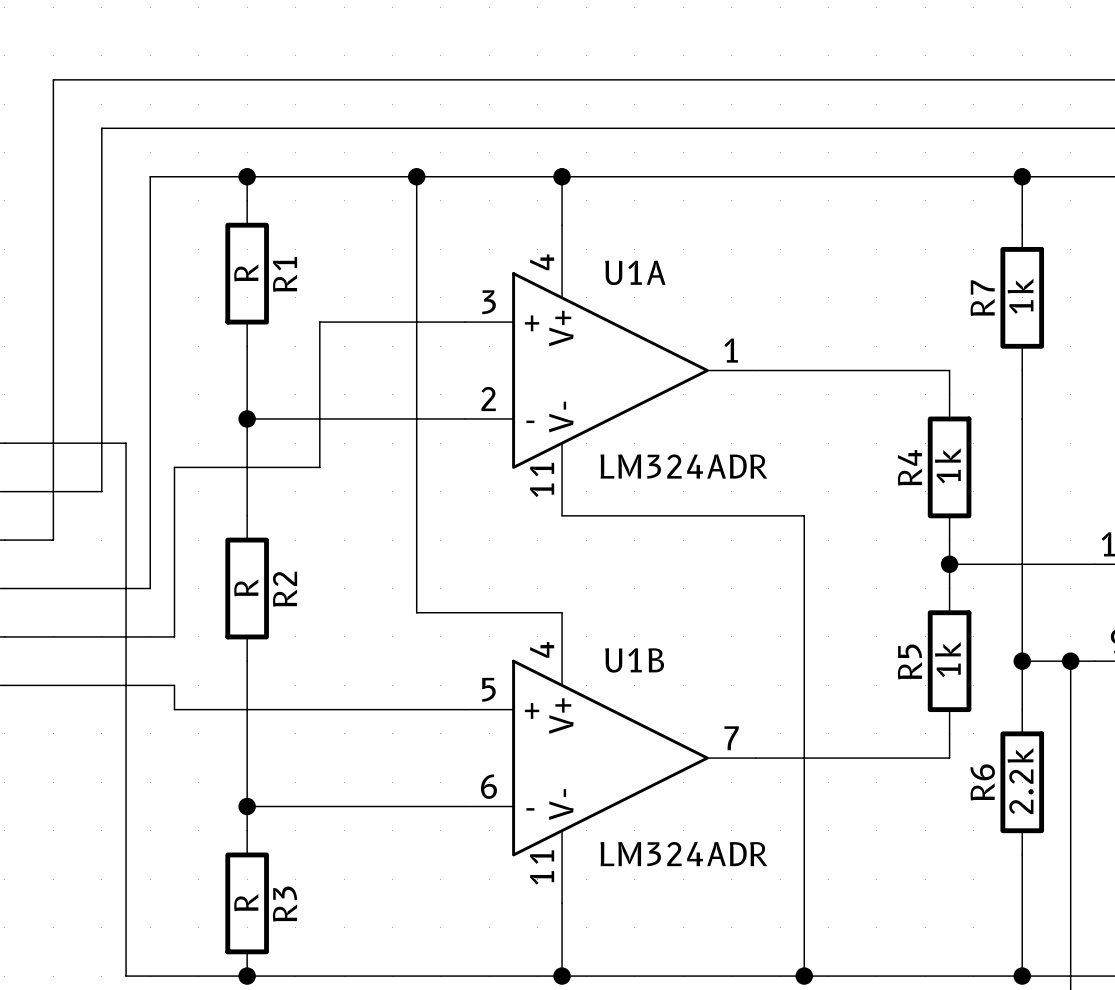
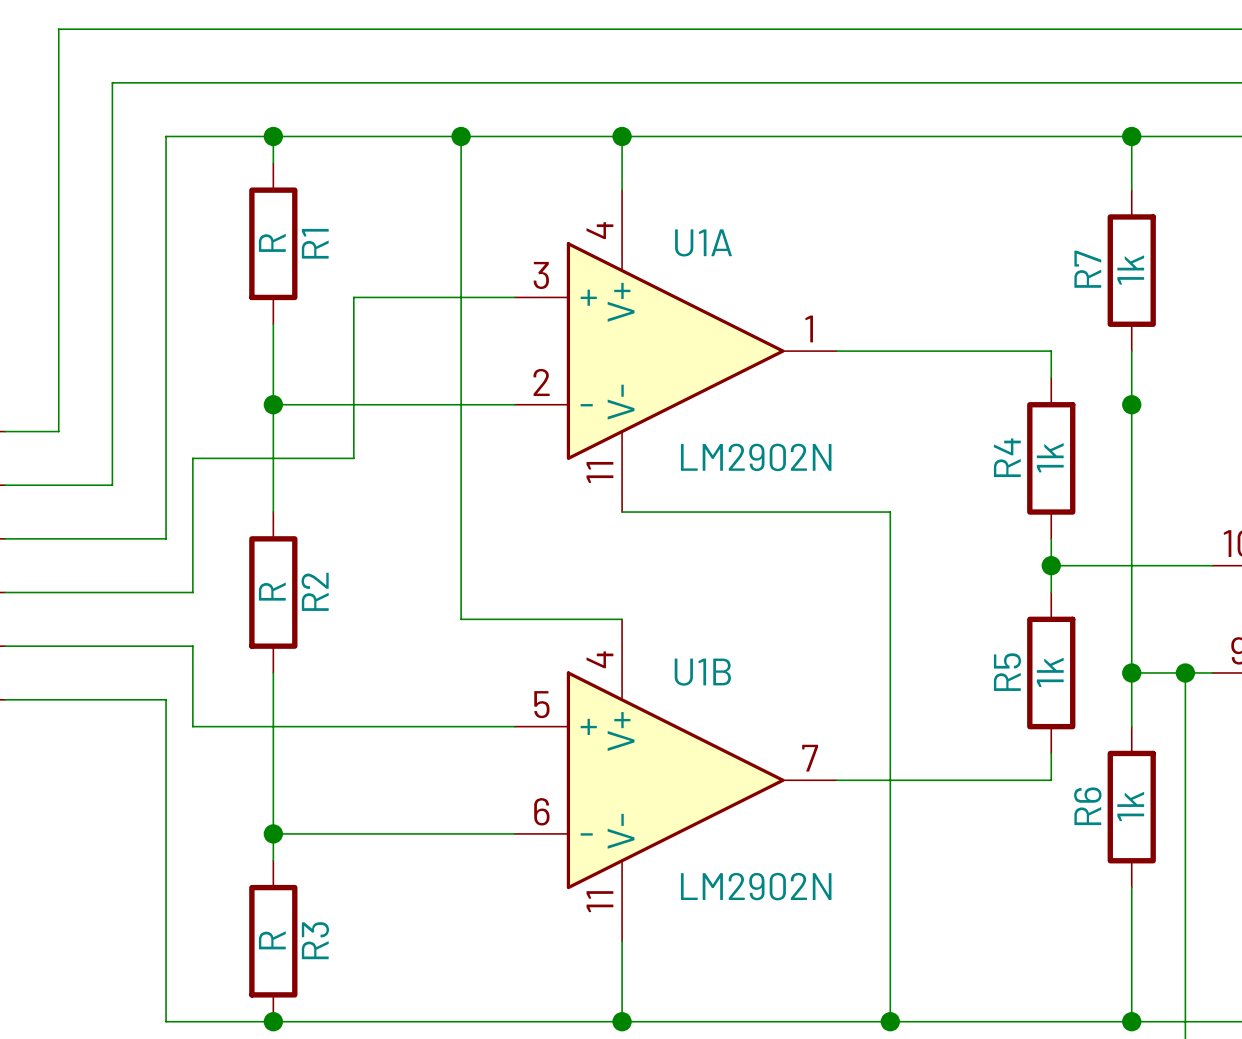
junction: none -> (1131, 404)
U1A value: LM324ADR (683, 466) -> LM2902N (756, 457)
wire: (53, 540) (53, 443) (126, 443) (126, 976) (150, 976) -> (166, 699) (166, 1021)
wire: none -> (58, 538) (166, 538)
wire: (150, 540) (150, 588) -> (192, 592) (166, 592)
wire: (174, 588) (174, 636) -> none
wire: (150, 685) (174, 685) -> (192, 646) (192, 699)
R6 value: 2.2k (1020, 781) -> 1k (1130, 806)
U1B value: LM324ADR (683, 854) -> LM2902N (756, 886)

